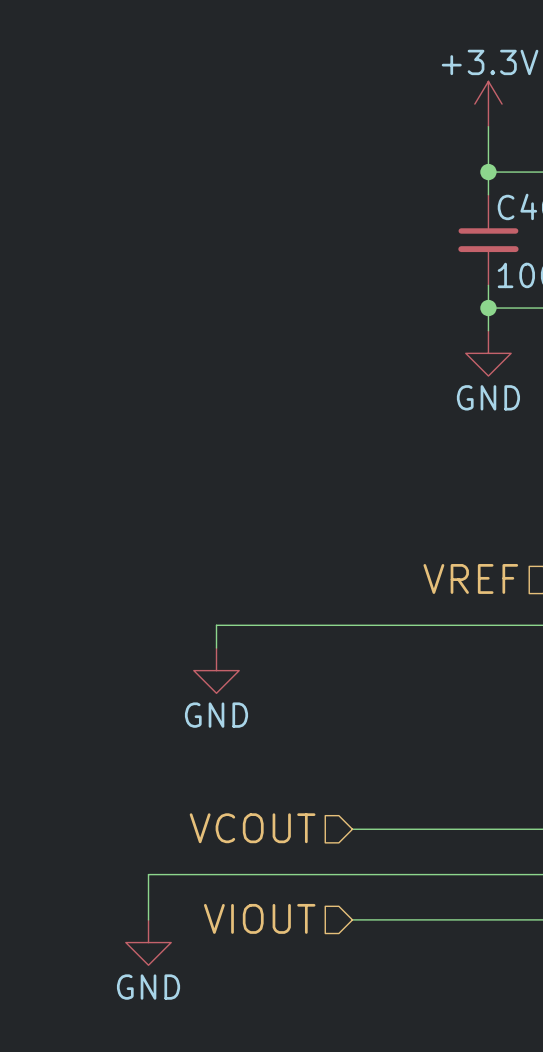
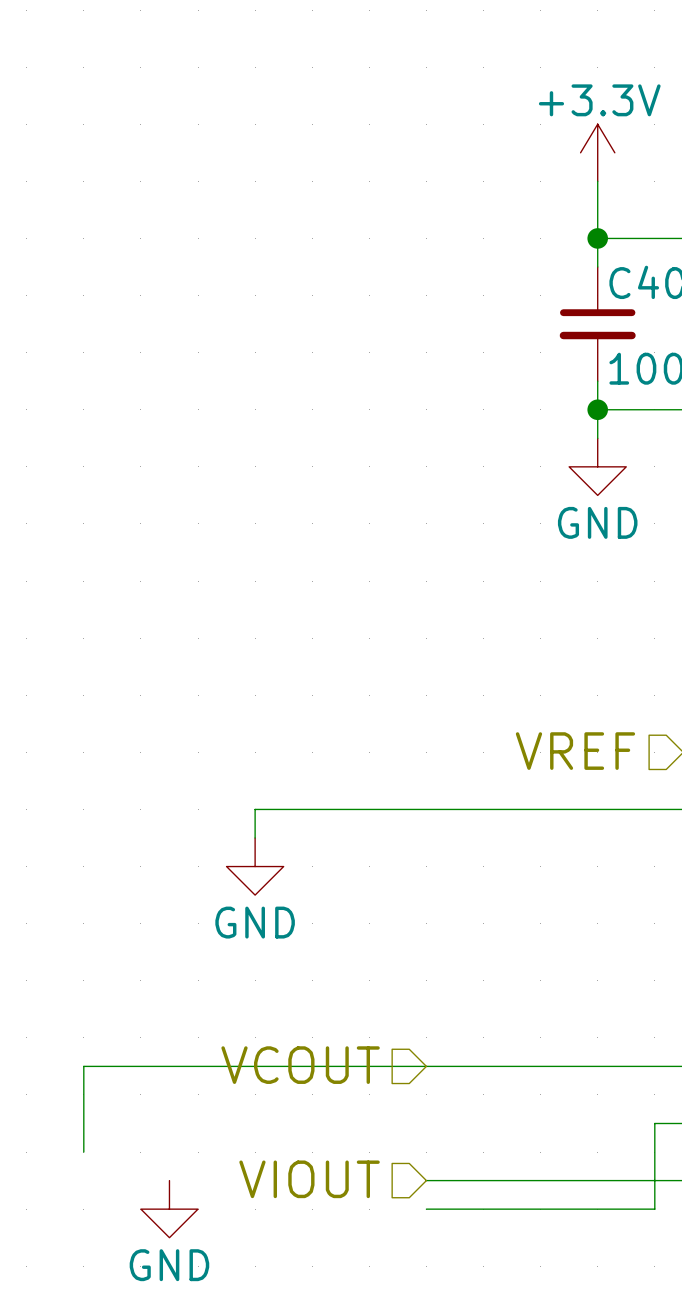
wire: none -> (426, 1066) (83, 1066) (83, 1152)
wire: (533, 874) (148, 874) (148, 919) -> (654, 1123) (654, 1209) (426, 1209)

